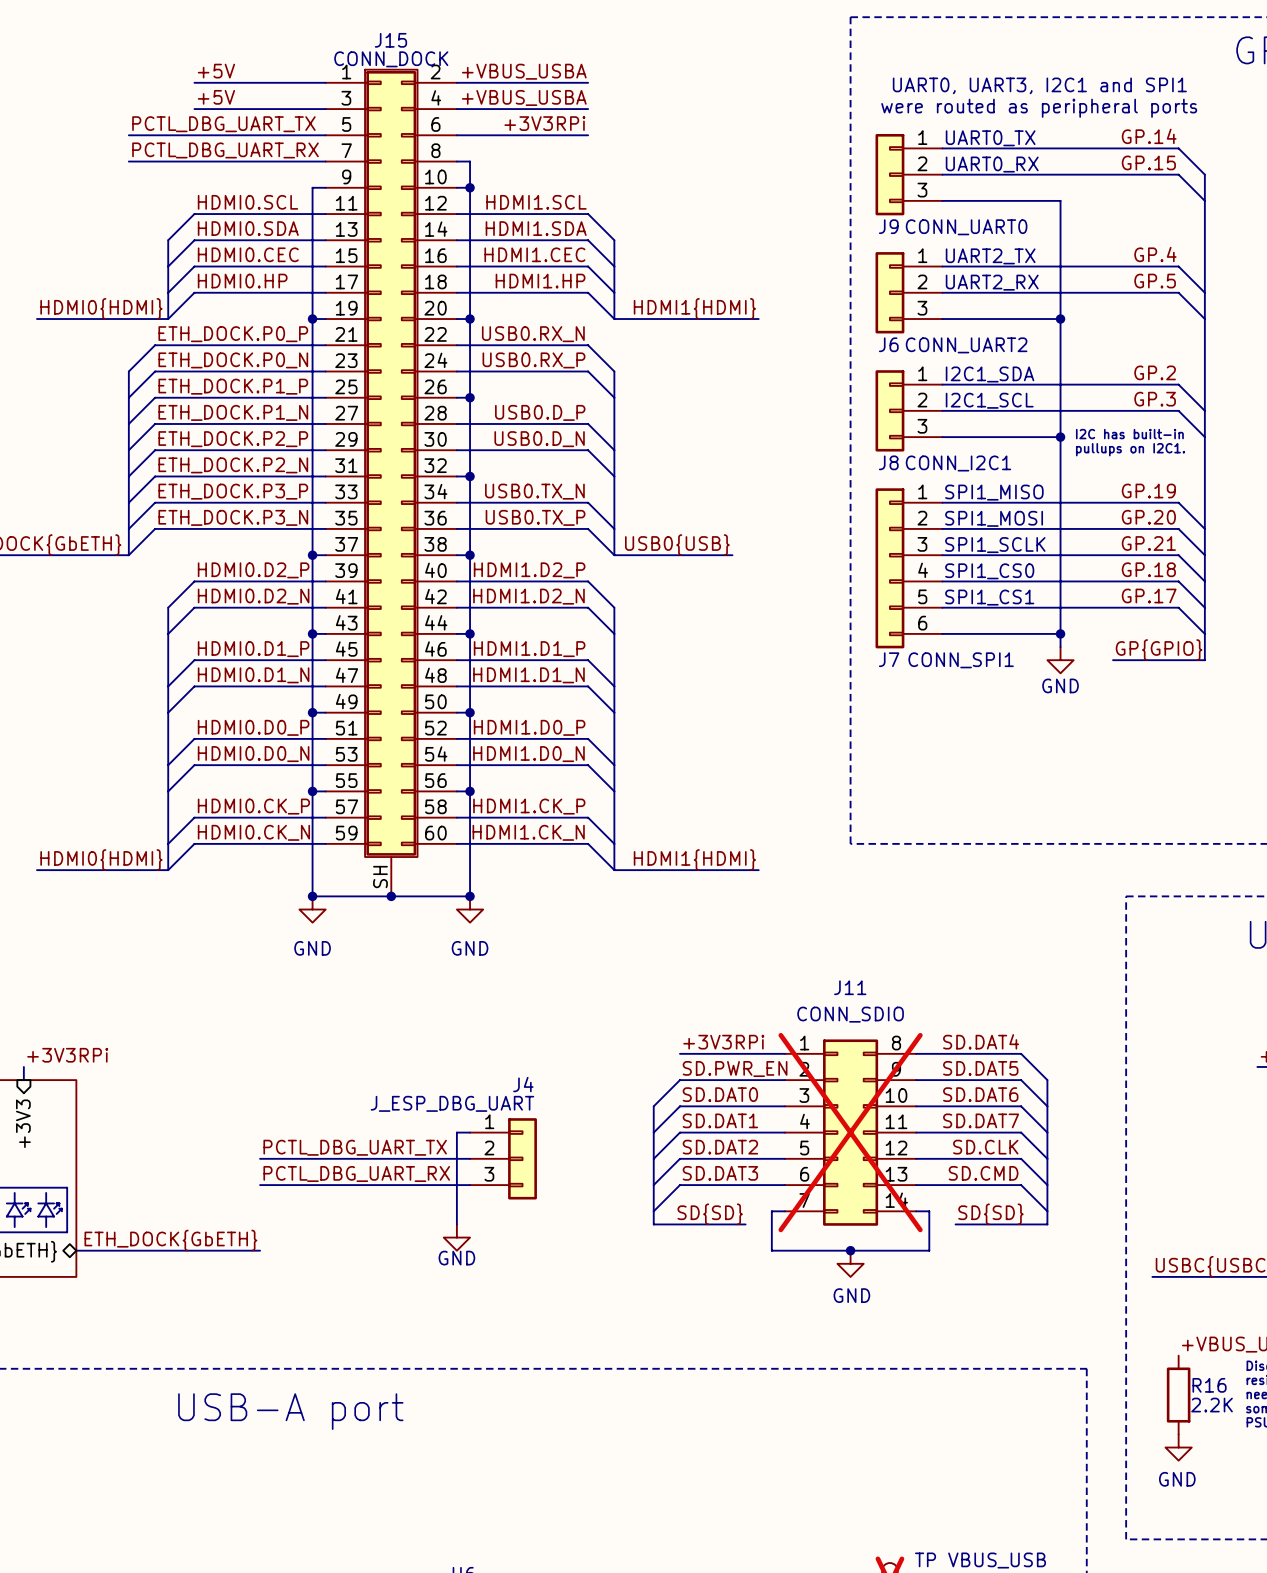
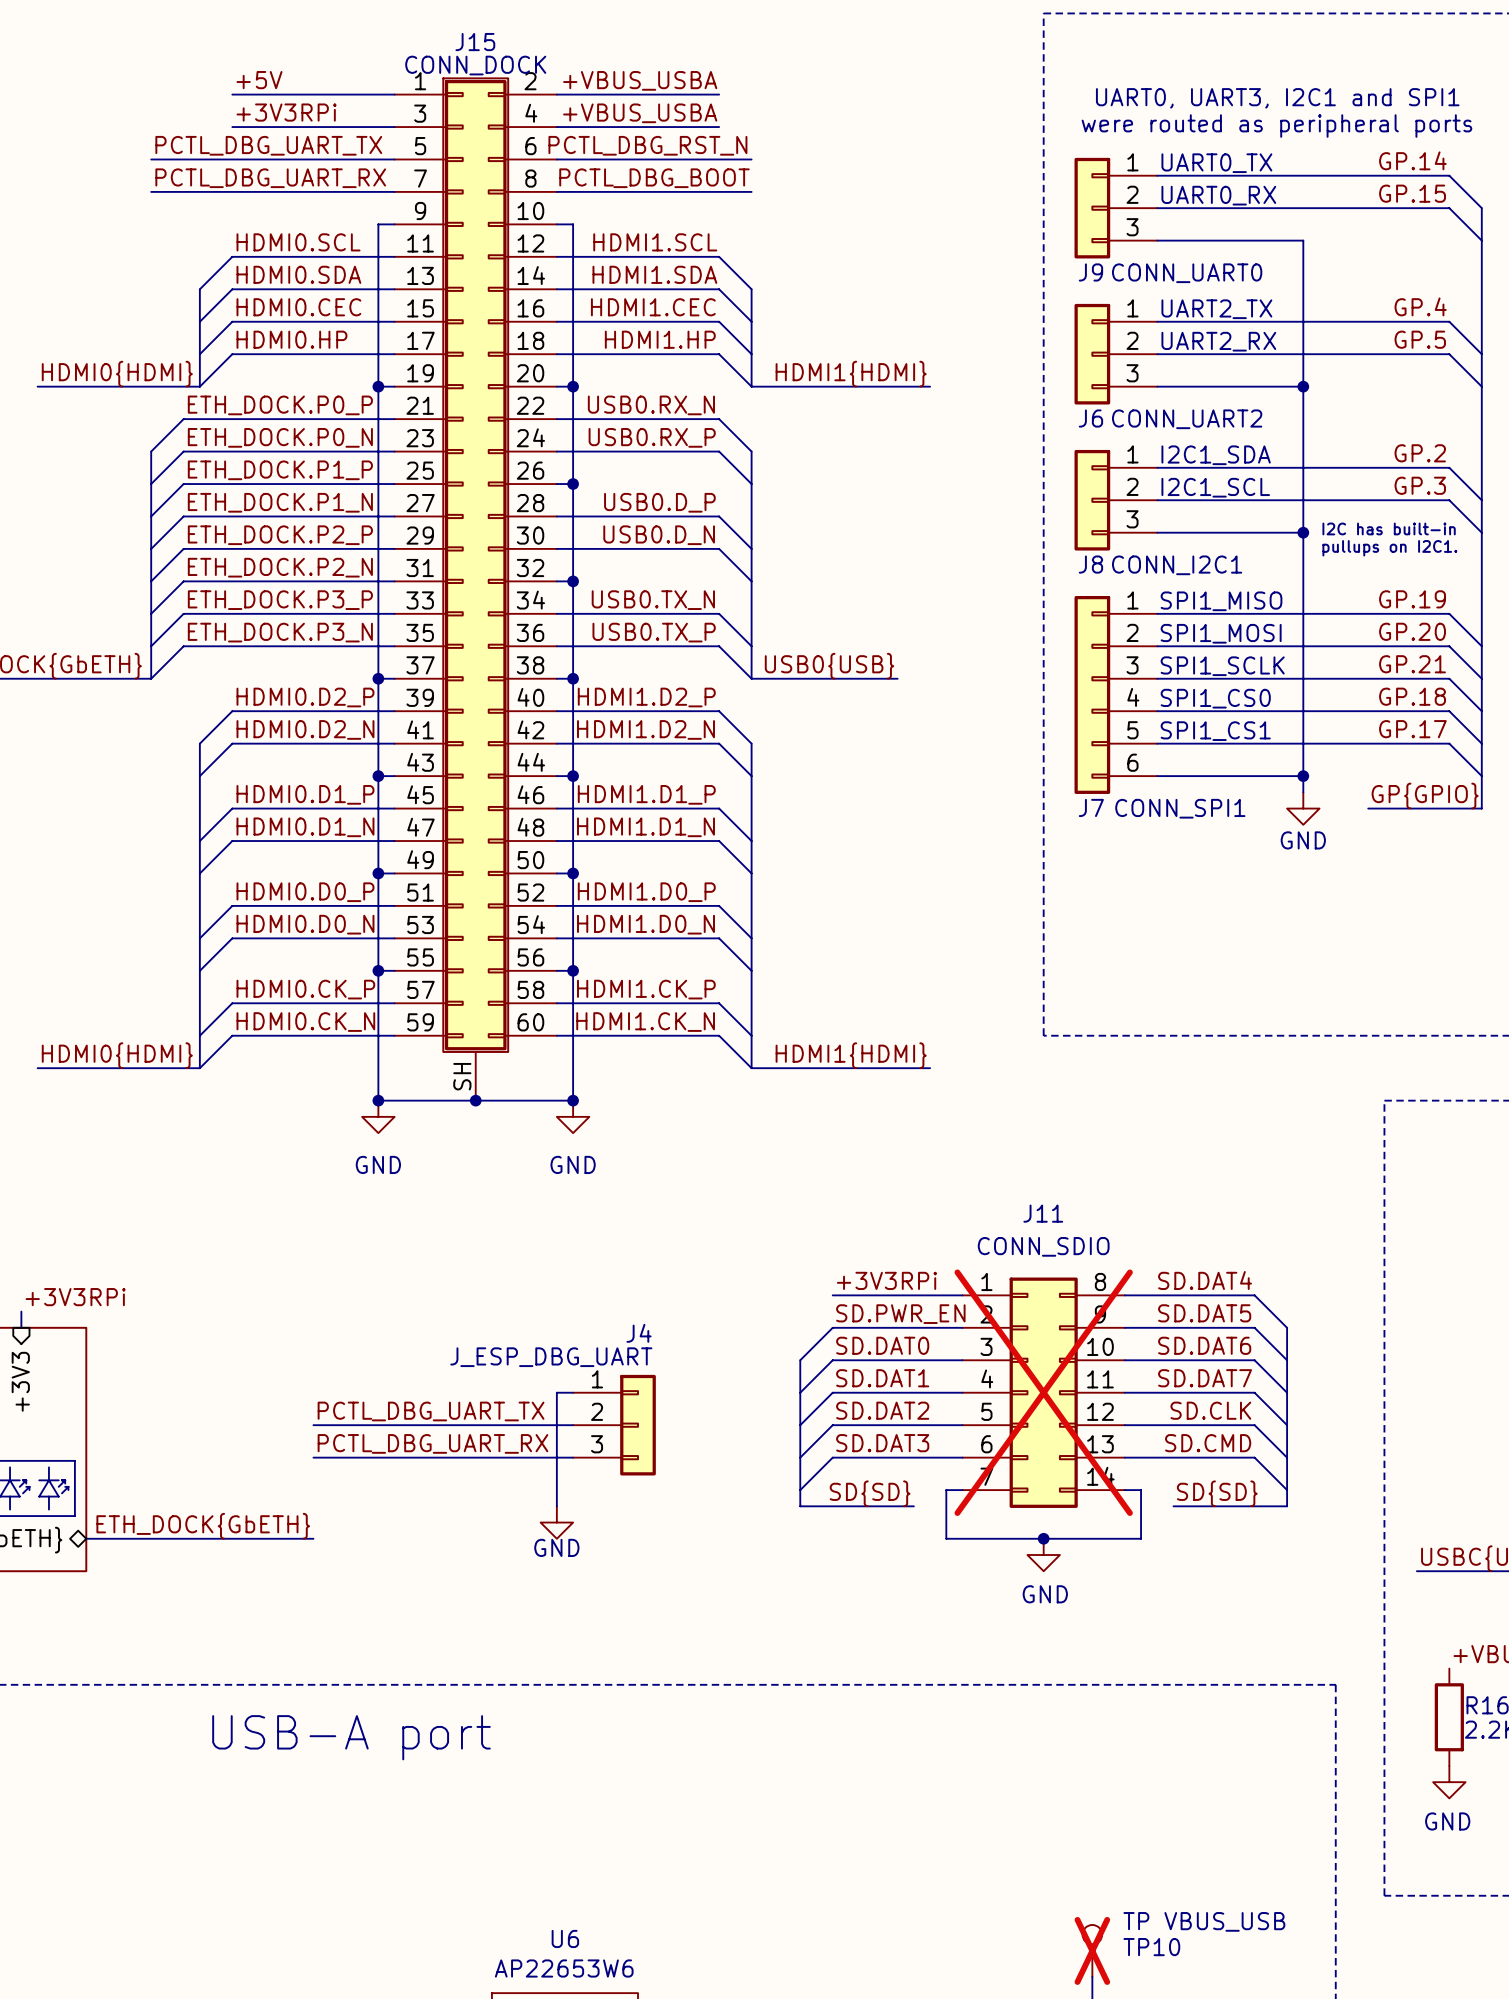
label: +5V (216, 97) -> +3V3RPi (286, 112)
label: +3V3RPi (544, 123) -> none
label: none -> PCTL_DBG_RST_N (647, 145)
wire: none -> (719, 159) (751, 159)
label: none -> PCTL_DBG_BOOT (654, 178)
wire: (470, 161) (470, 187) -> (573, 191) (751, 191)
junction: (470, 187) -> none

